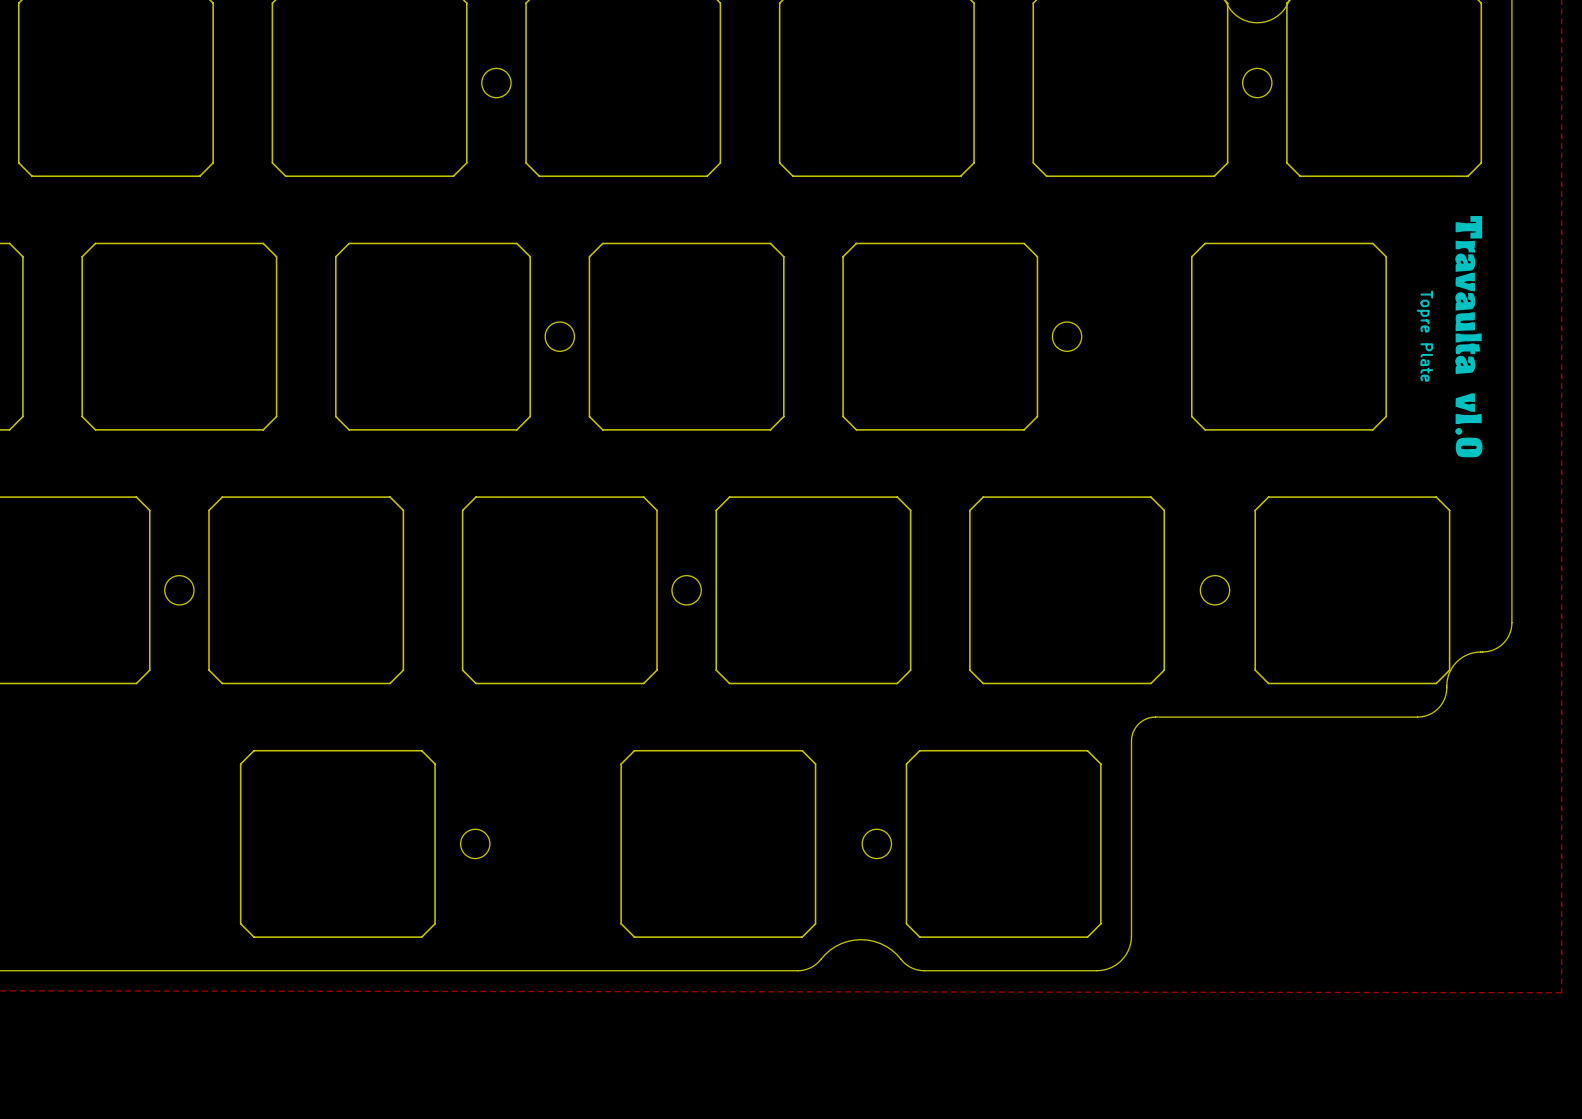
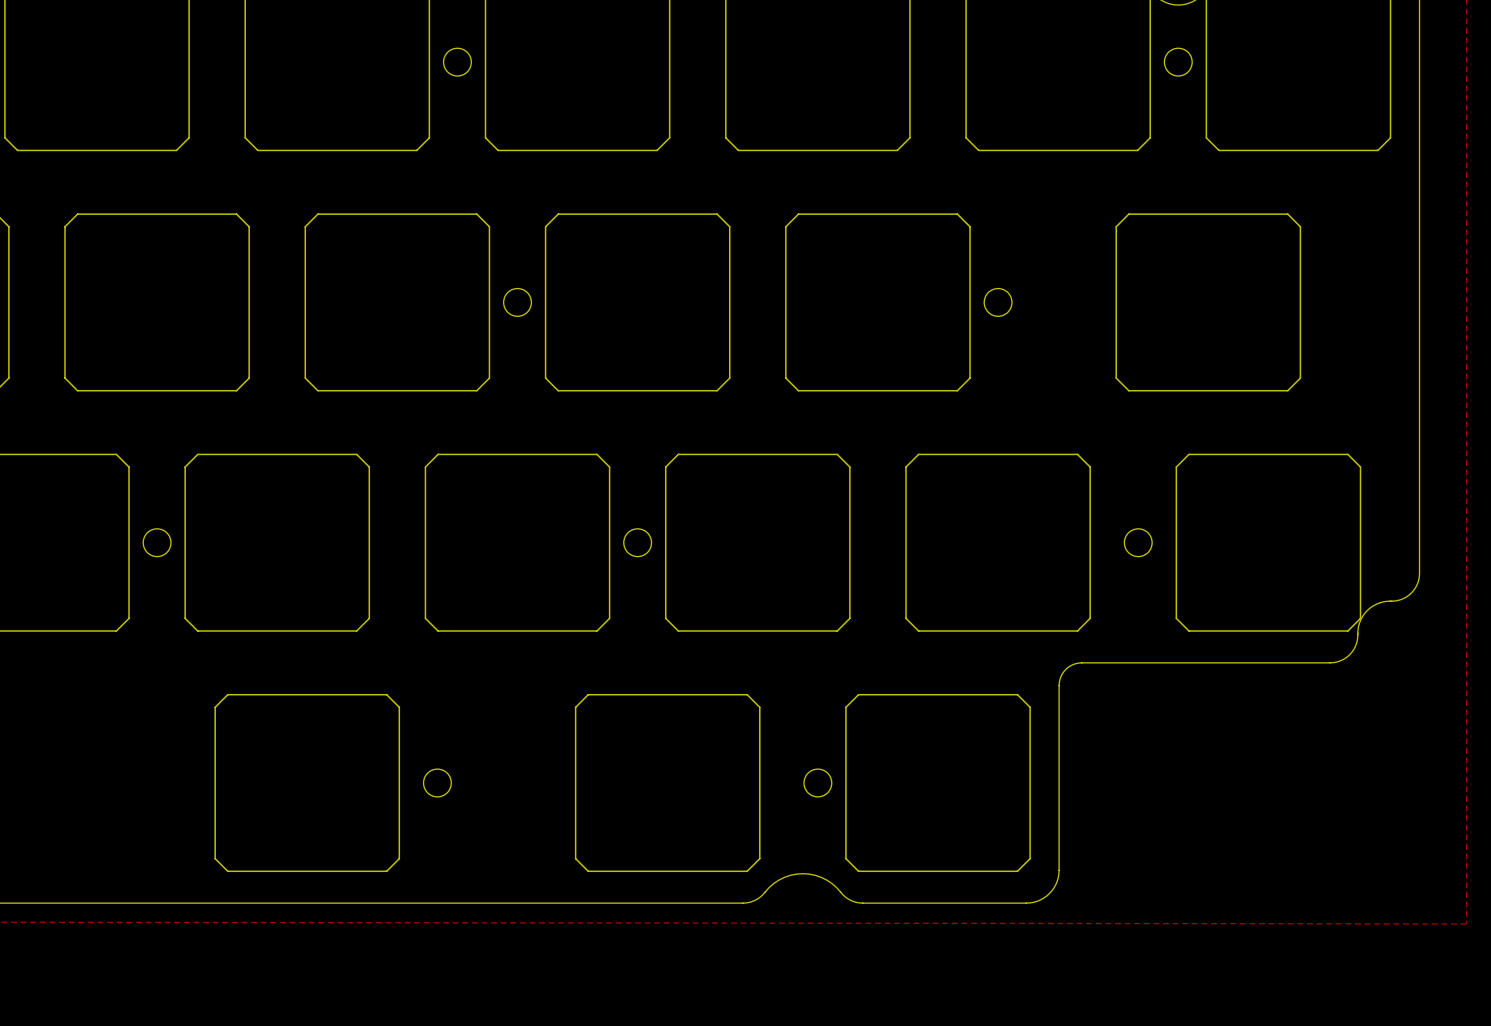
drawing: [1455, 215, 1483, 458] -> none
text: Topre Plate (1425, 336) -> none

